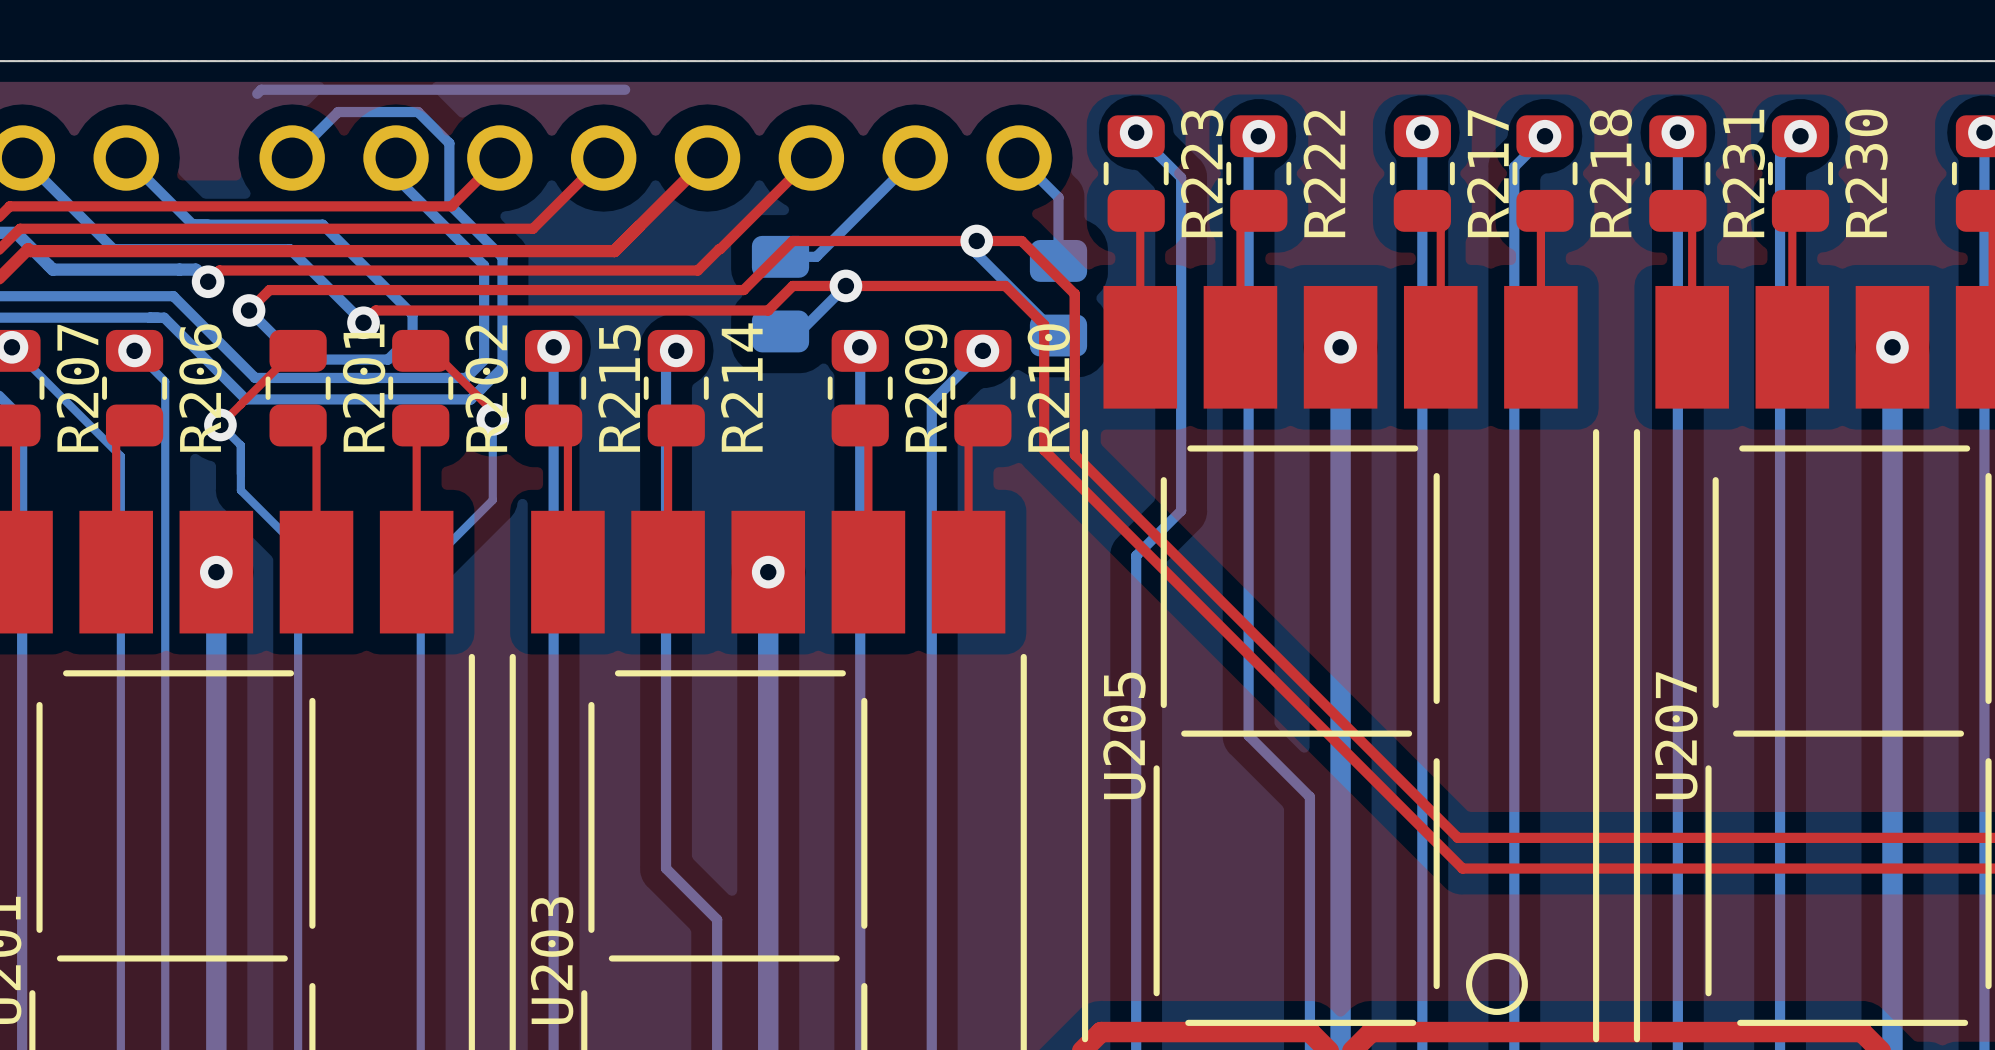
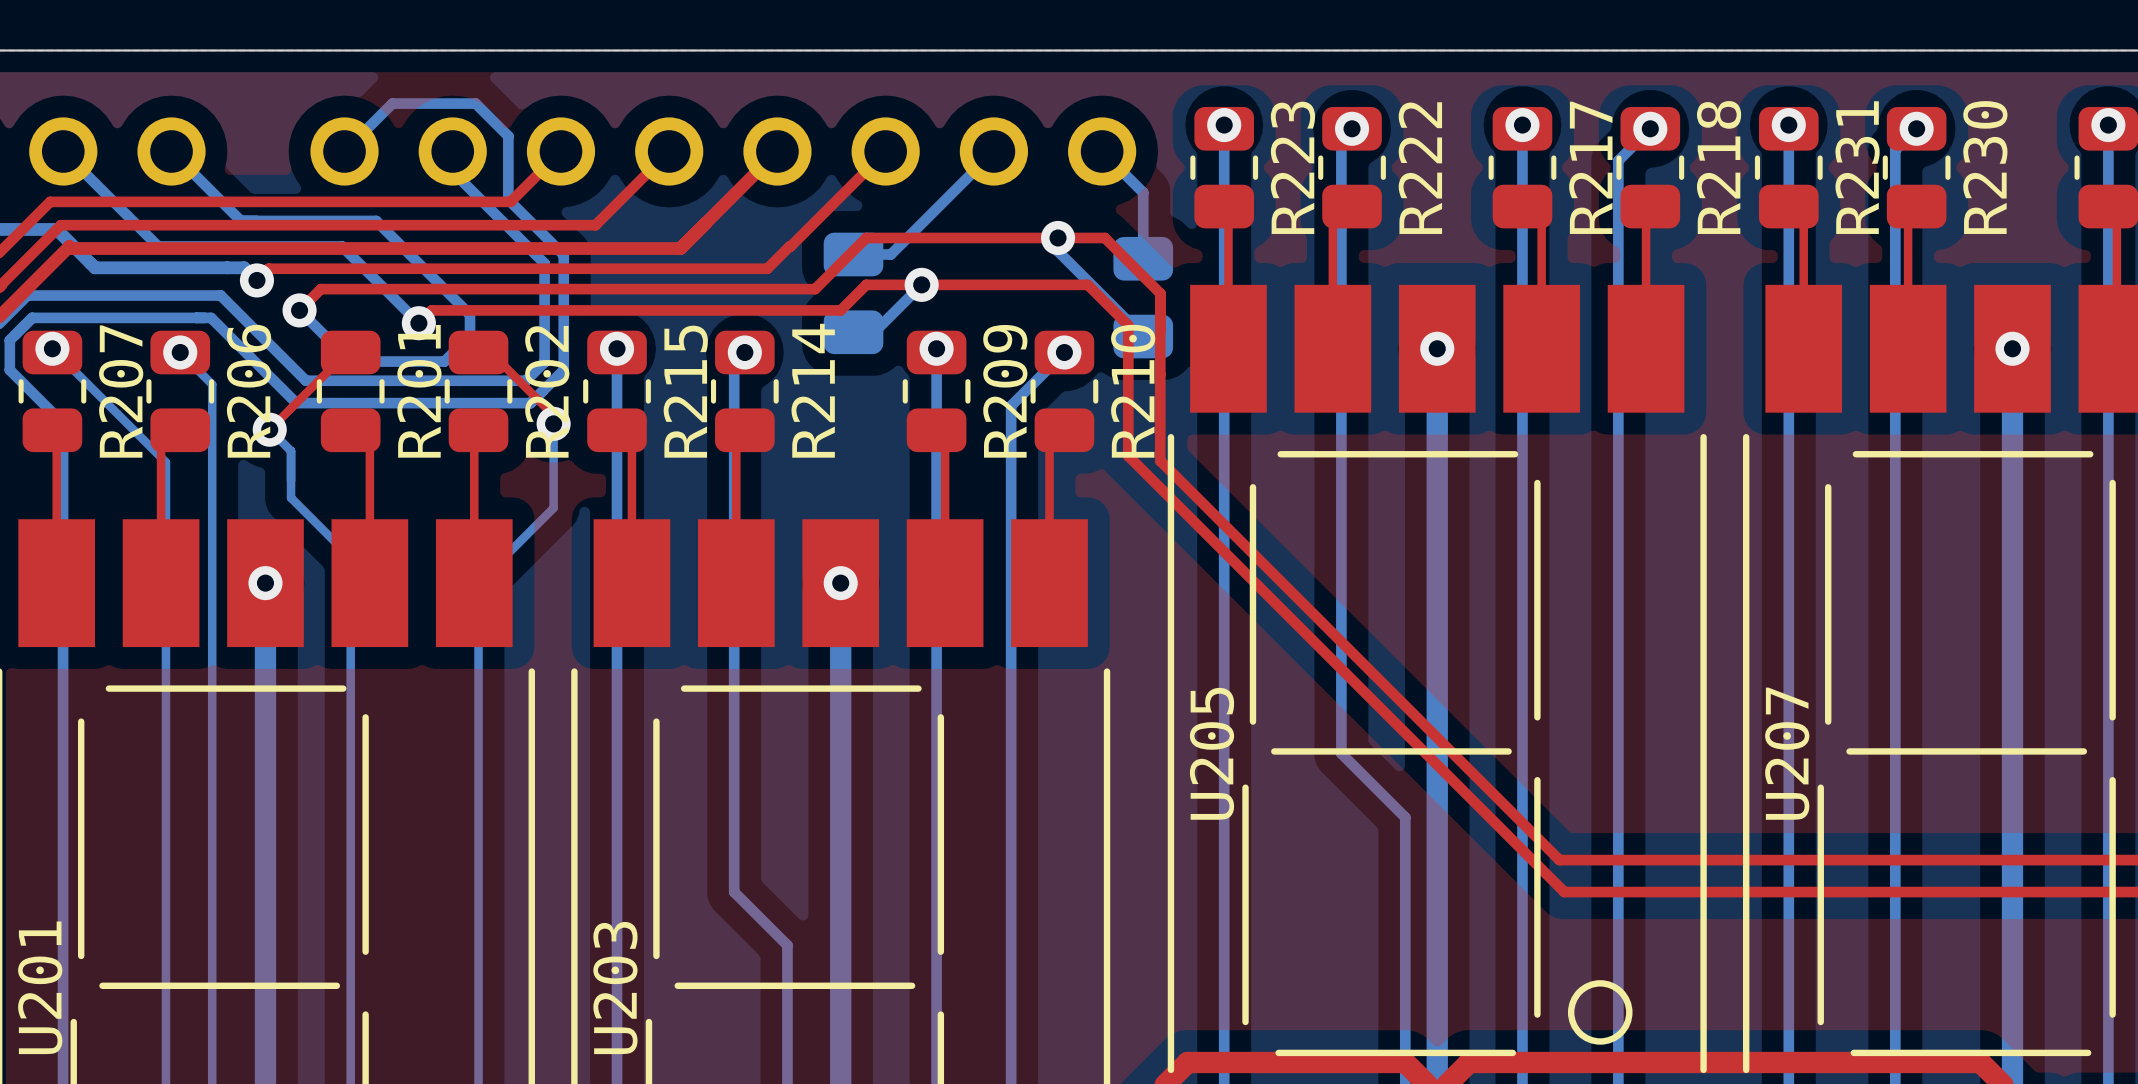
bottom track: (625, 89) (261, 89) (257, 93) -> none
bottom track: (1136, 132) (1181, 177) (1181, 510) (1136, 555) -> (1224, 125) (1224, 566)

